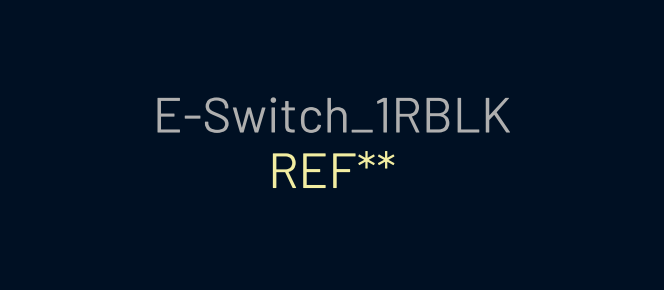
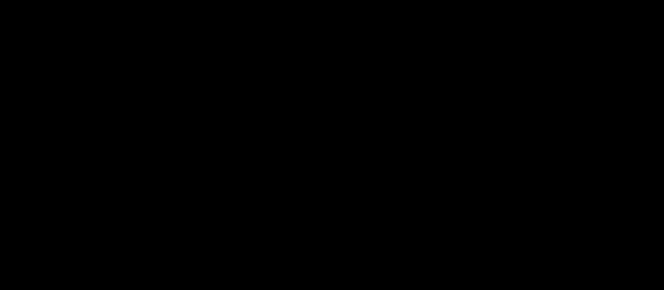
REF**: E-Switch_1RBLK (333, 142) -> none

